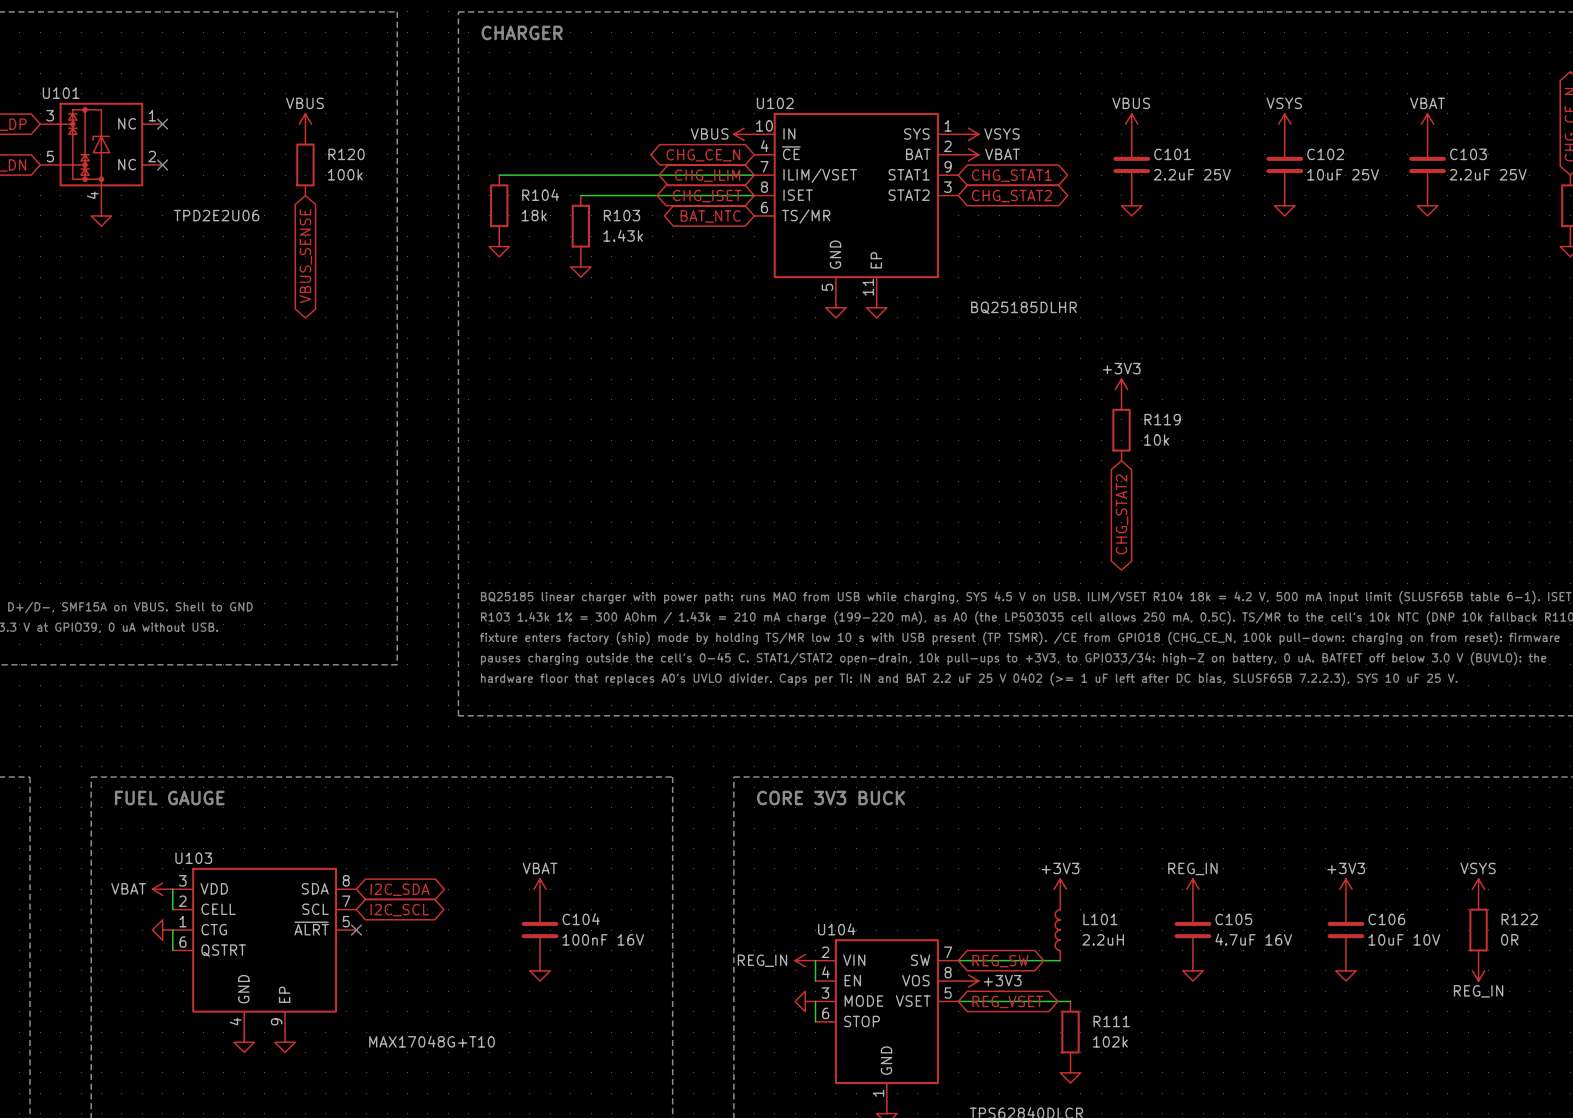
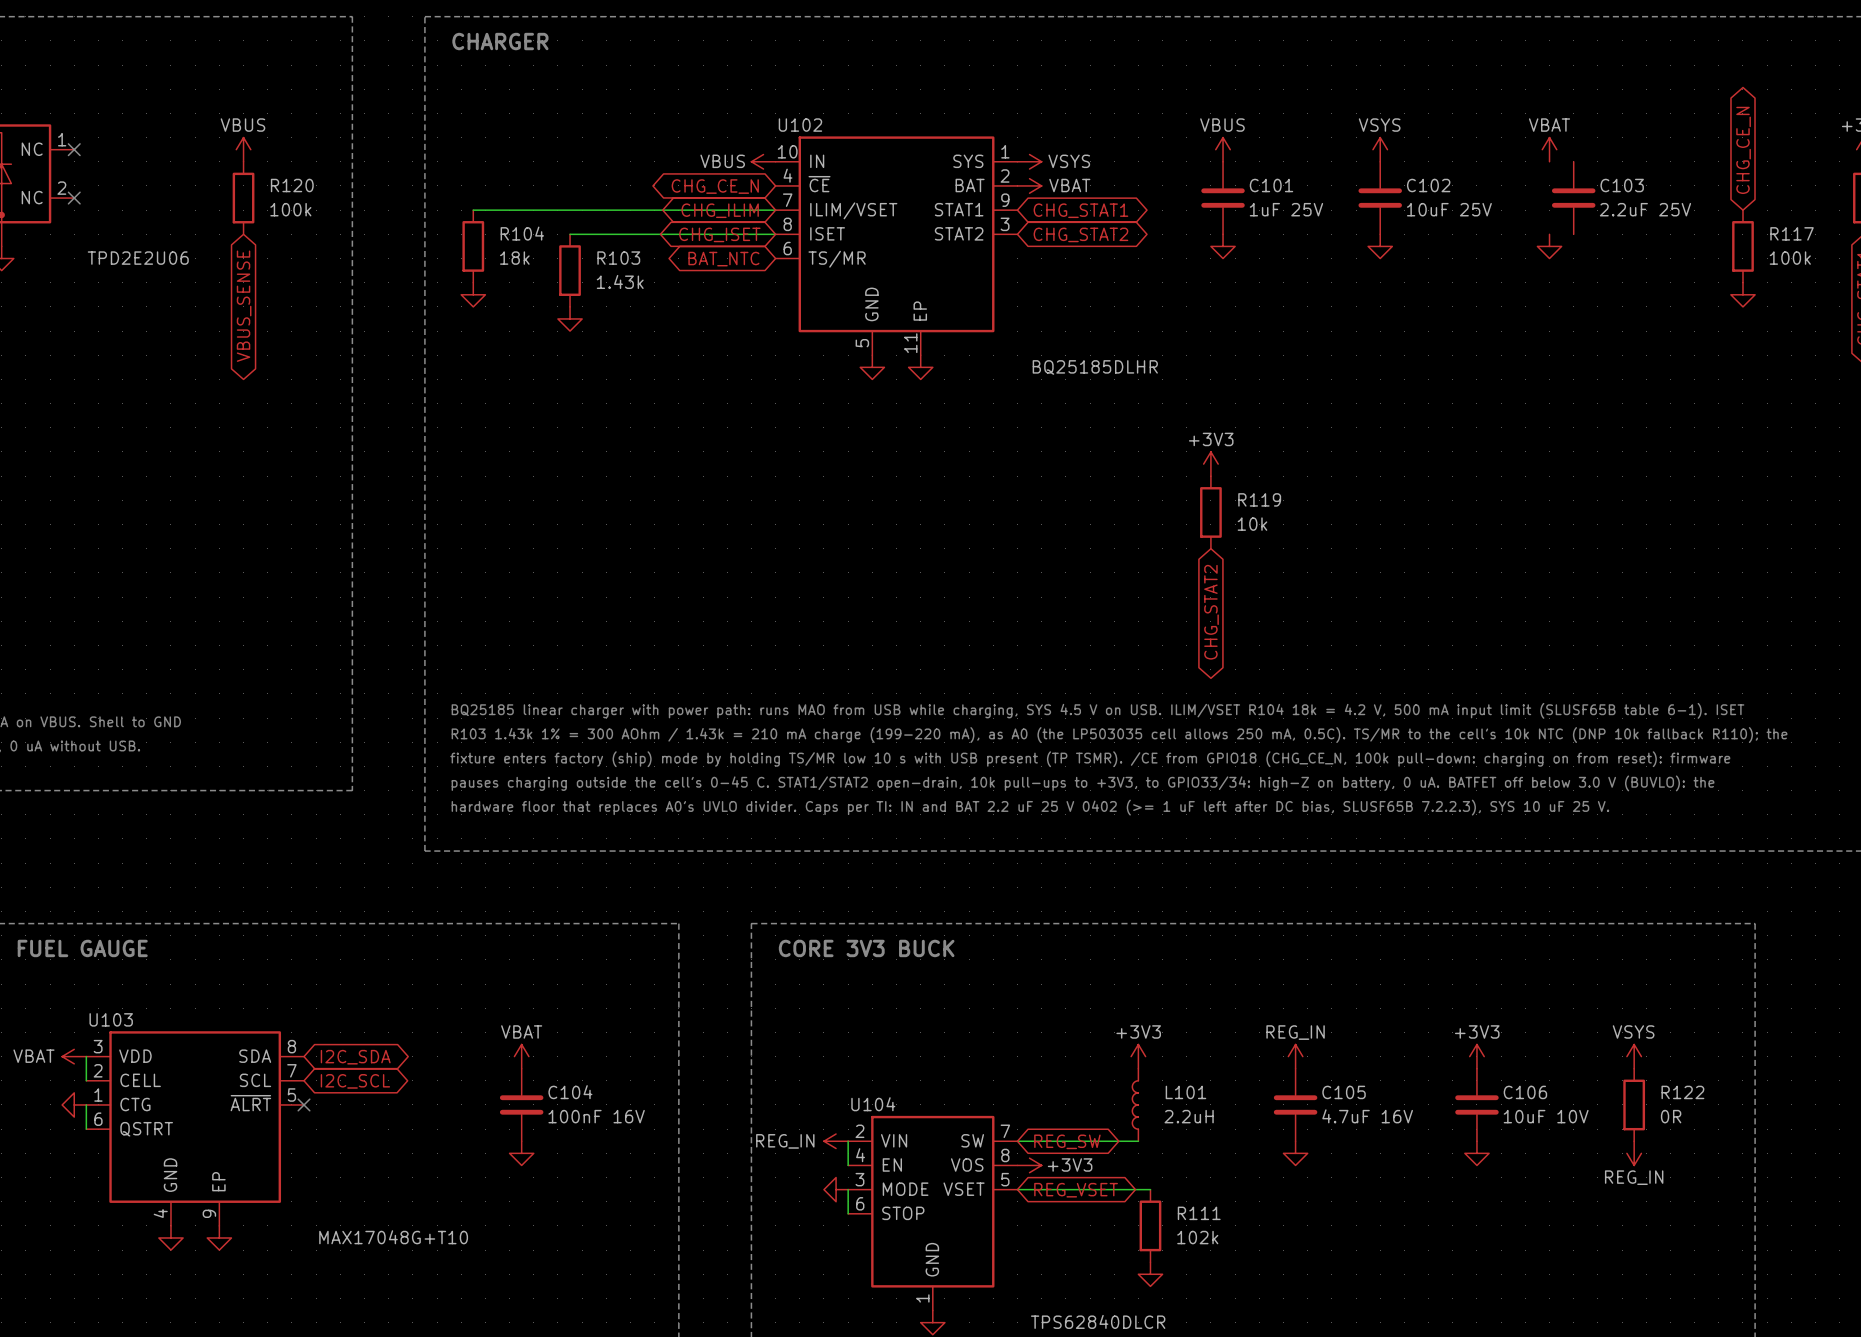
power symbol position: VSYS (1284, 124) -> VSYS (1380, 149)
power symbol position: VBAT (1427, 124) -> VBAT (1549, 149)
C102 position: (1284, 164) -> (1380, 198)
C101 value: 2.2uF 25V (1192, 174) -> 1uF 25V (1286, 209)
power symbol position: (1284, 205) -> (1380, 246)
power symbol position: (1427, 205) -> (1549, 246)

